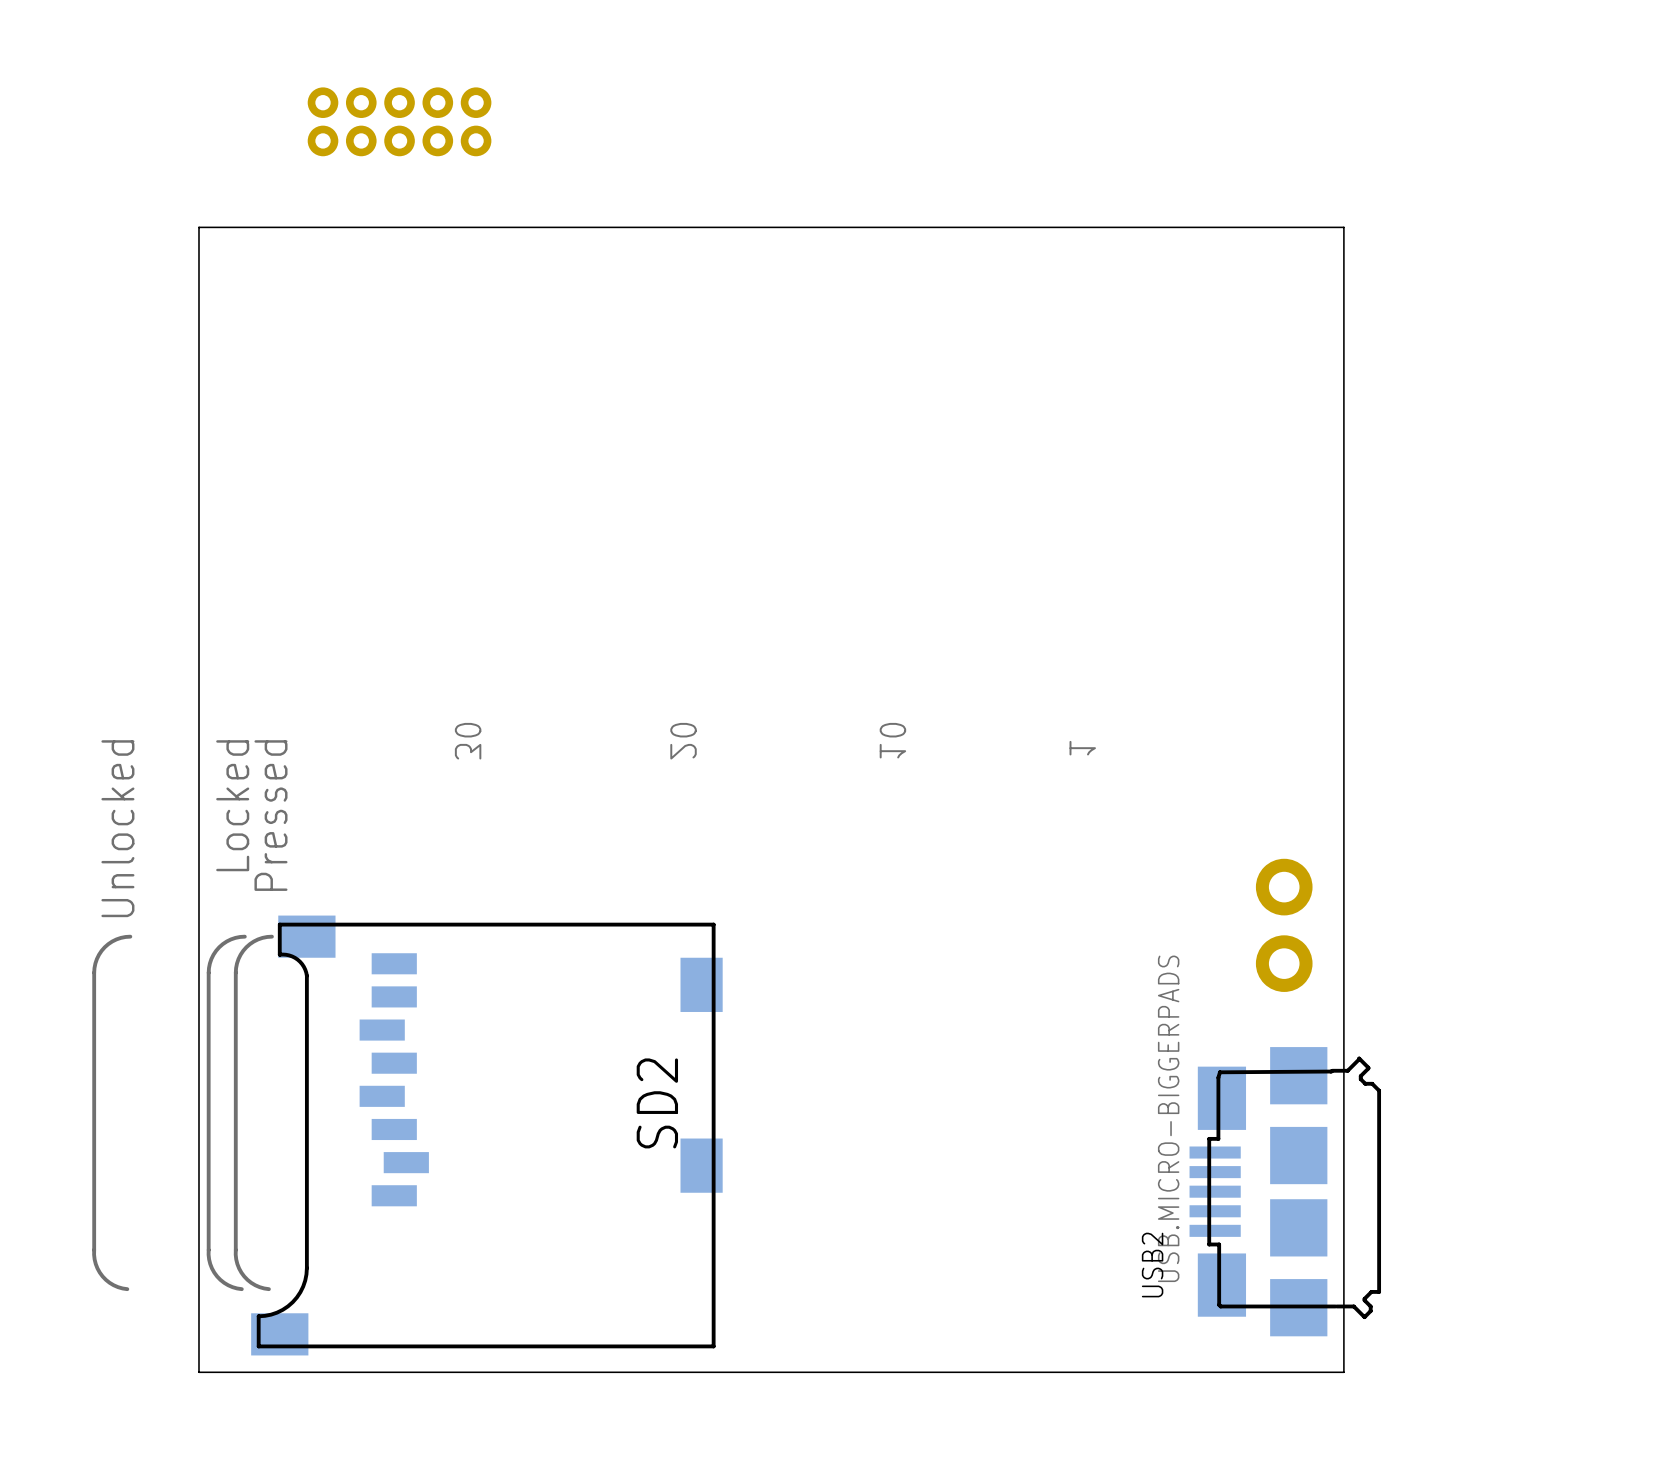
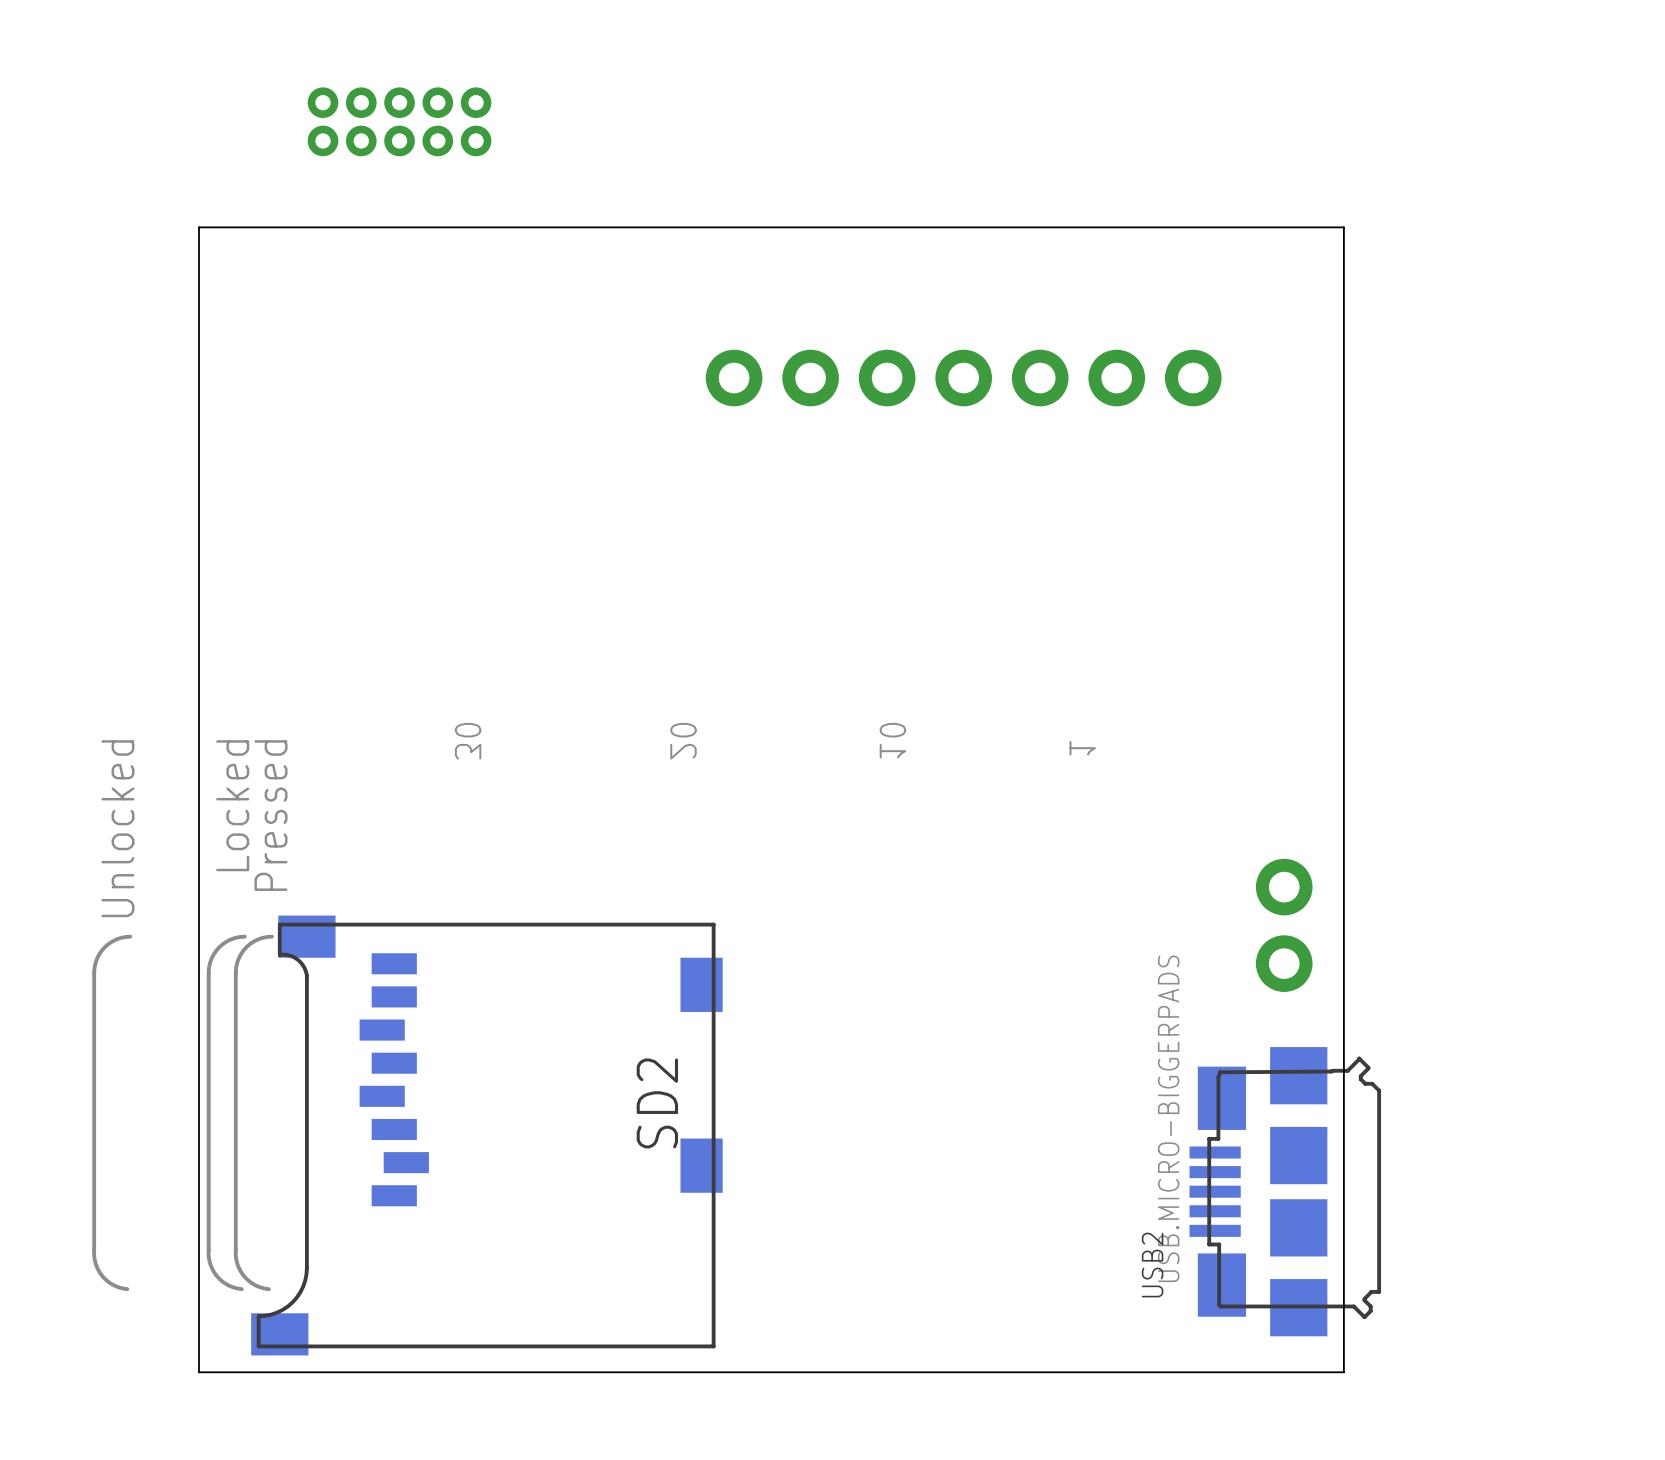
part: none -> (963, 378)

